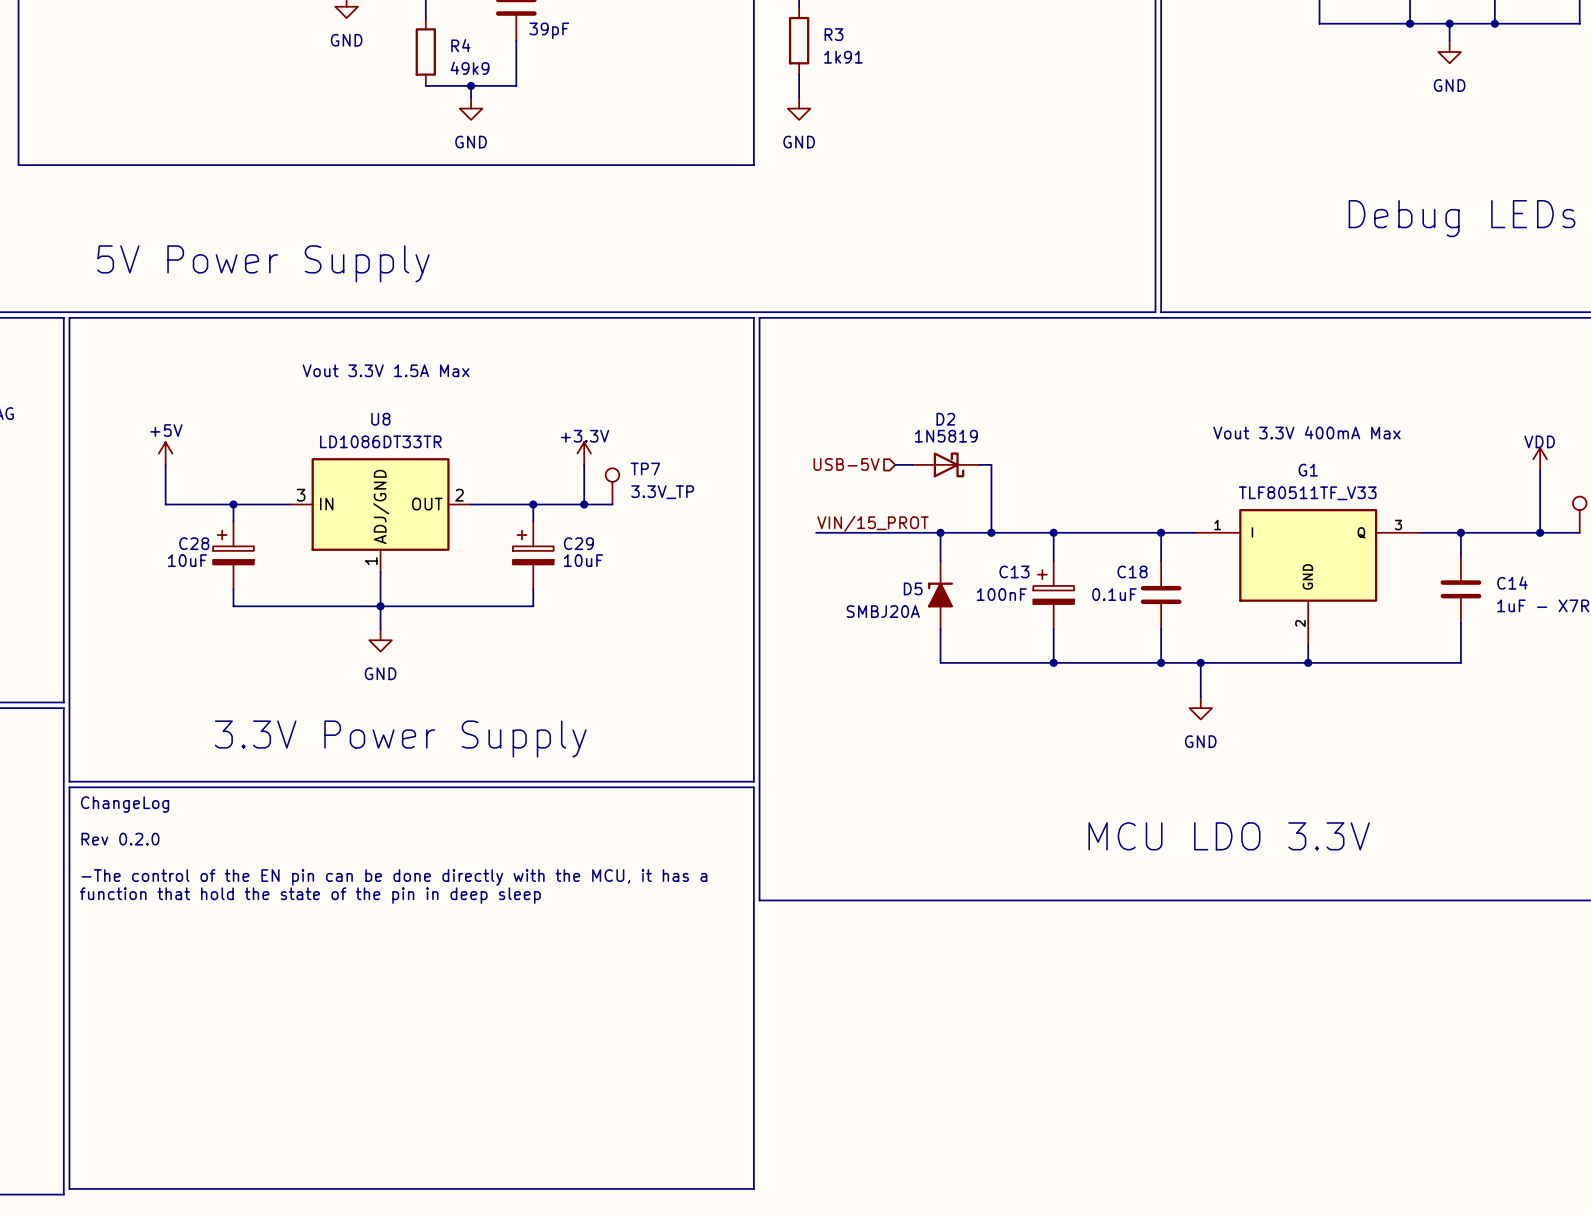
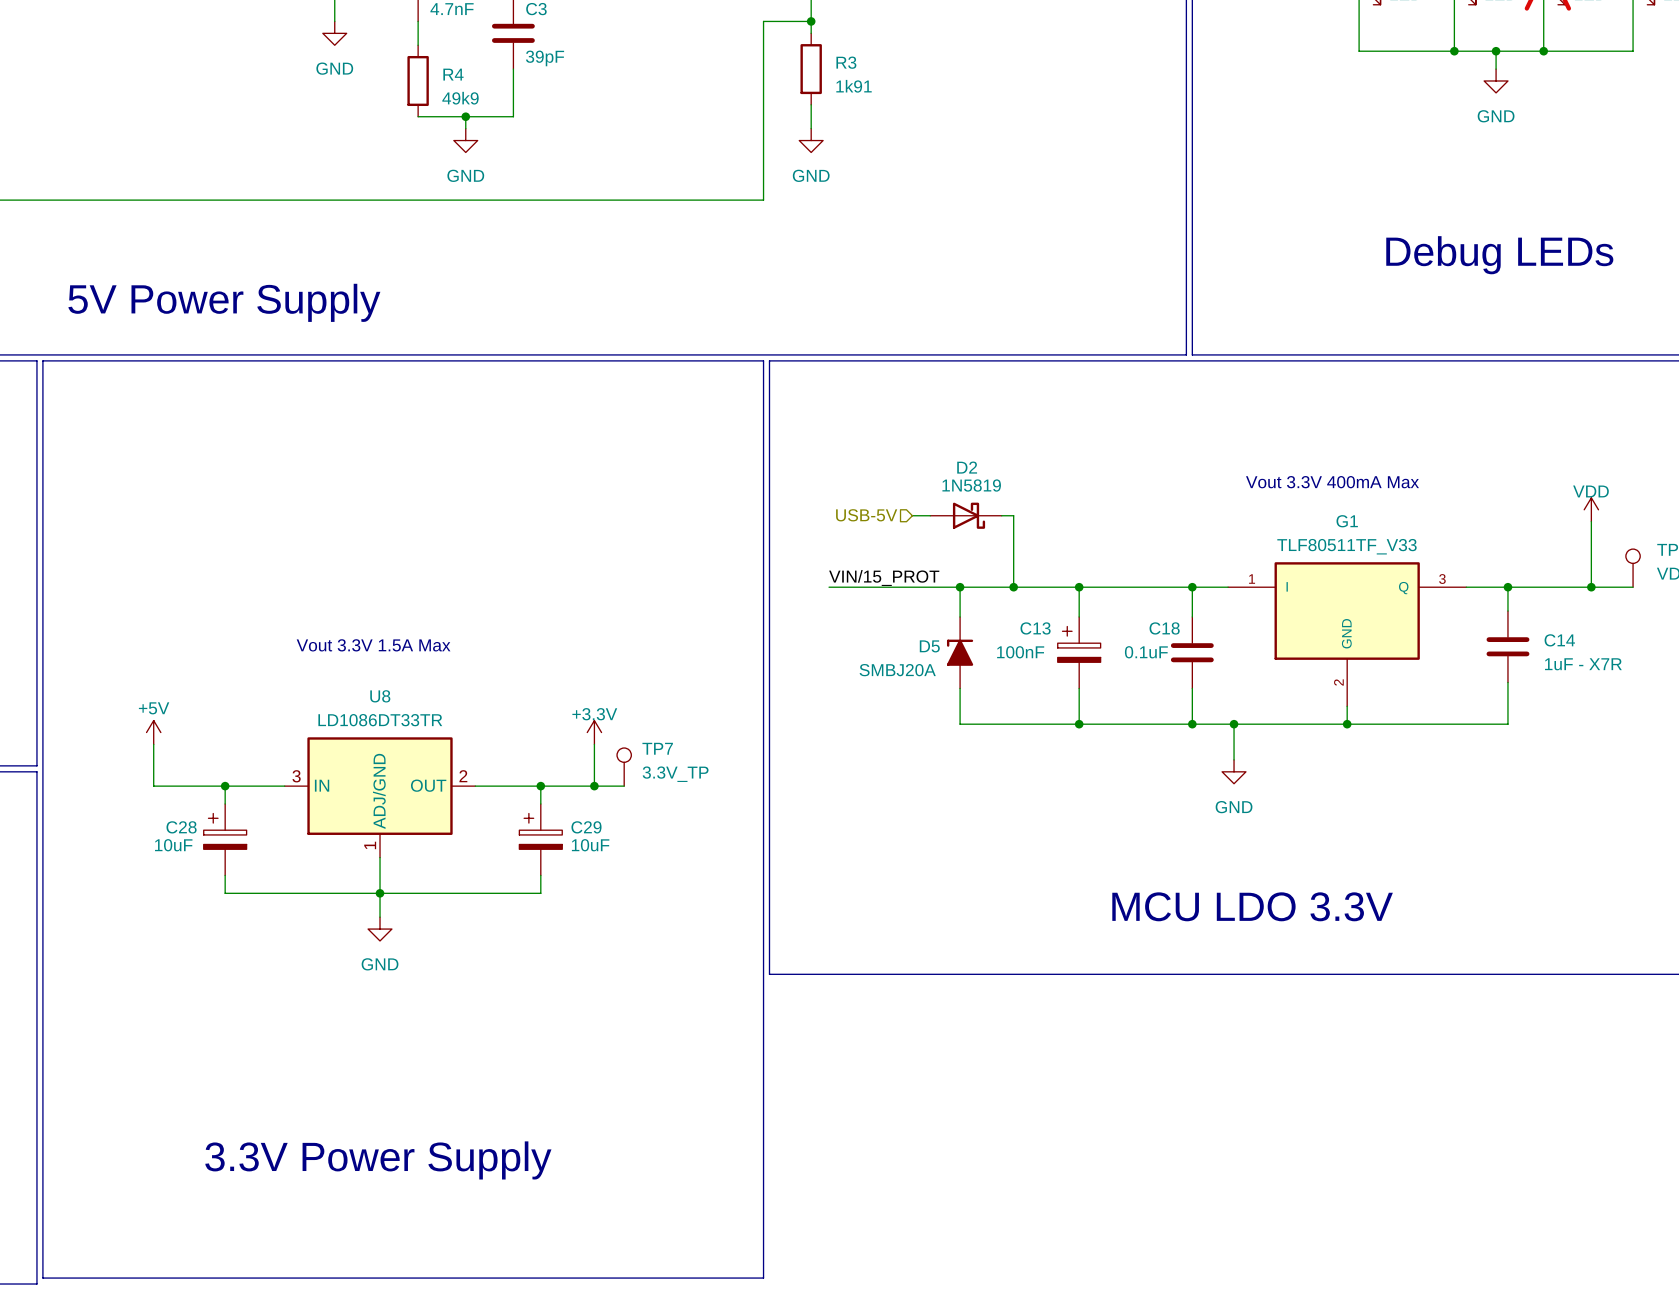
text position: Vout 3.3V 1.5A Max (386, 370) -> Vout 3.3V 1.5A Max (373, 645)
power symbol position: +5V (165, 453) -> +5V (153, 732)
power symbol position: +3.3V (584, 453) -> +3.3V (594, 732)
wire: (165, 464) (165, 504) (290, 504) -> (153, 744) (153, 786) (284, 786)
wire: (584, 464) (584, 504) -> (594, 744) (594, 786)
TP7 position: (612, 486) -> (624, 767)
wire: (233, 504) (233, 521) -> (225, 786) (225, 803)
junction: (233, 504) -> none
wire: (471, 504) (612, 504) -> (475, 786) (624, 786)
wire: (533, 504) (533, 521) -> (540, 786) (540, 803)
junction: (533, 504) -> none
junction: (584, 504) -> none
U8 position: (380, 515) -> (380, 797)
C28 position: (233, 555) -> (225, 839)
C29 position: (533, 555) -> (540, 839)
wire: (380, 572) (380, 628) -> (380, 857) (380, 917)
wire: (233, 589) (233, 606) (533, 606) (533, 589) -> (225, 875) (225, 893) (540, 893) (540, 875)
junction: (380, 606) -> none
power symbol position: GND (380, 640) -> GND (380, 929)
junction: none -> (225, 786)
junction: none -> (540, 786)
junction: none -> (594, 786)
text: 3.3V Power Supply (400, 738) -> none
line: (69, 781) (753, 781) -> (763, 855) (763, 849)
line: (69, 787) (753, 787) -> (42, 855) (42, 849)
text: ChangeLog (125, 804) -> none
junction: none -> (380, 893)
text: Rev 0.2.0 (120, 839) -> none
text: -The control of the EN pin can be done directly with the MCU, it has a (394, 877) -> none
text: function that hold the state of the pin in deep sleep (310, 895) -> none
text: none -> 3.3V Power Supply (378, 1160)

